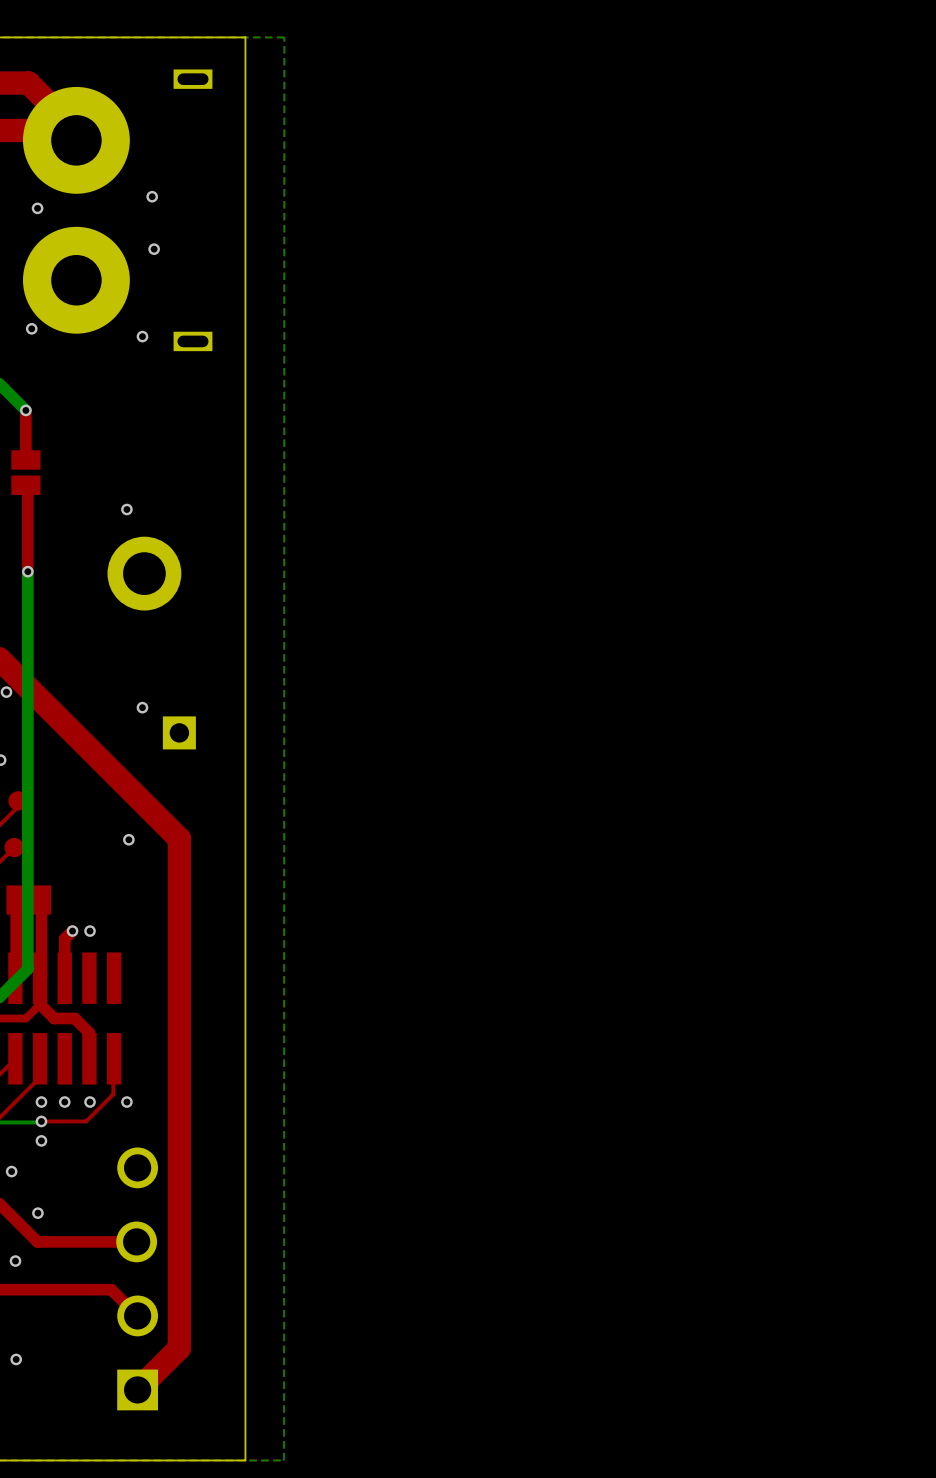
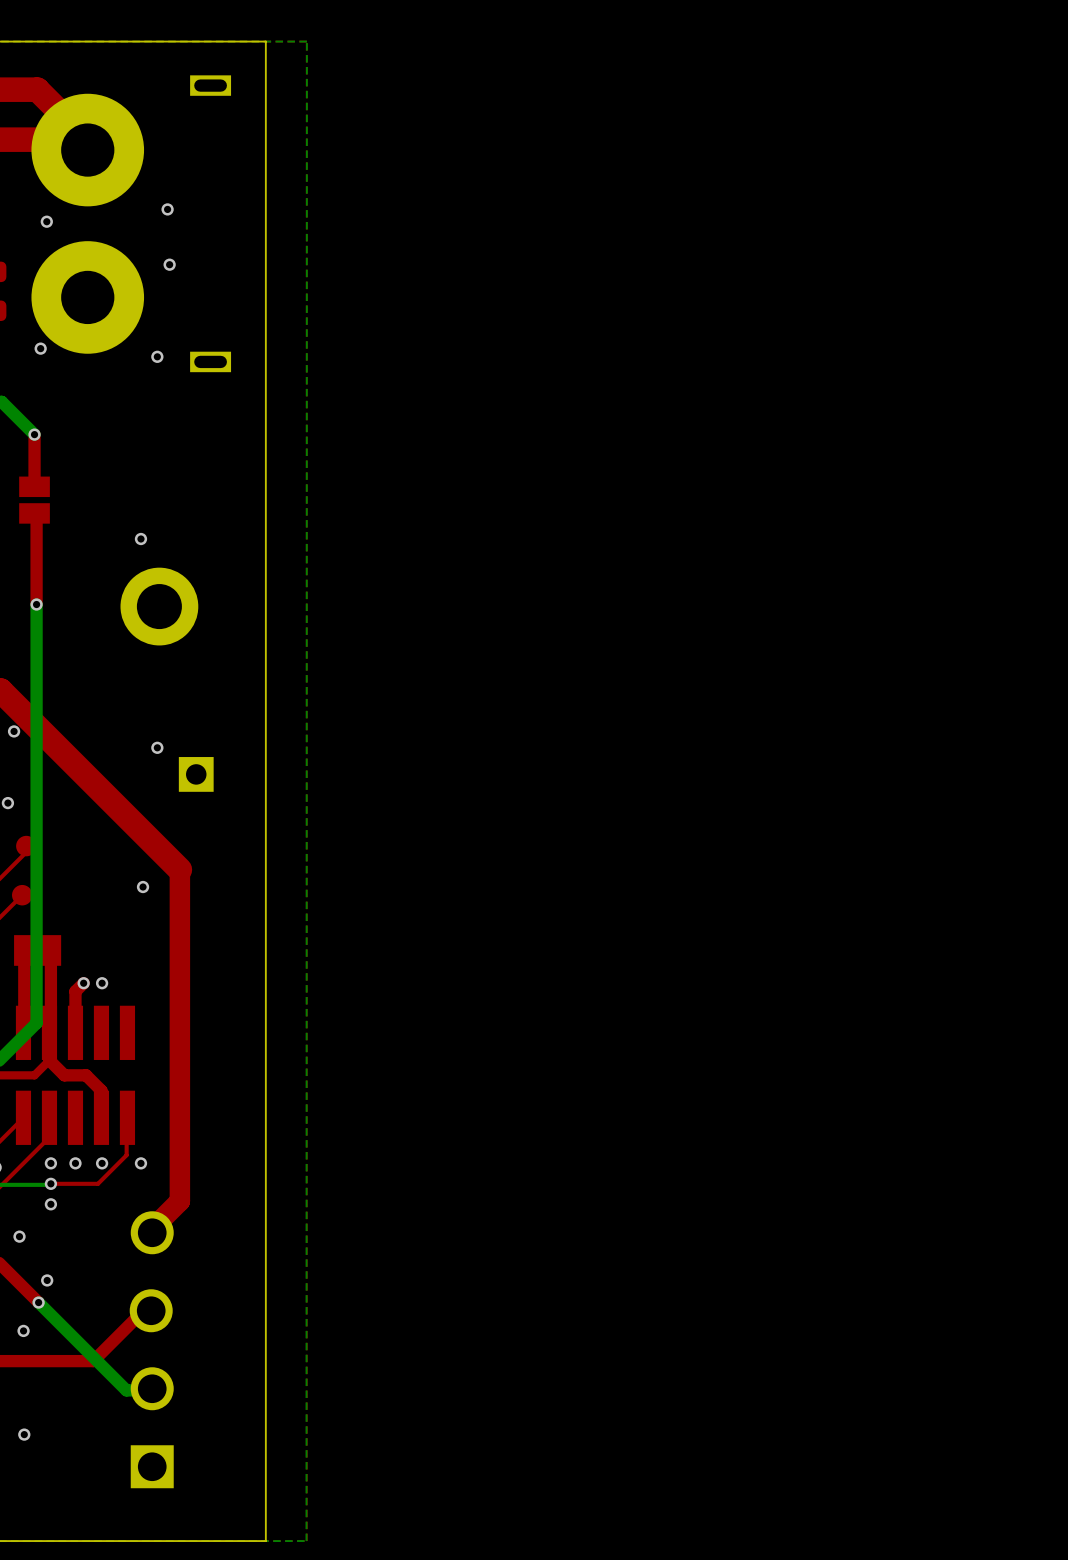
top track: (163, 823) (179, 838) (179, 1348) (137, 1389) -> (179, 869) (179, 1201) (153, 1227)
top track: (29, 1234) (37, 1241) (136, 1241) -> none
bottom track: none -> (38, 1302) (126, 1390) (153, 1390)
via: none -> (38, 1302)
top track: (81, 1289) (111, 1289) (137, 1315) -> (93, 1361) (142, 1312)

